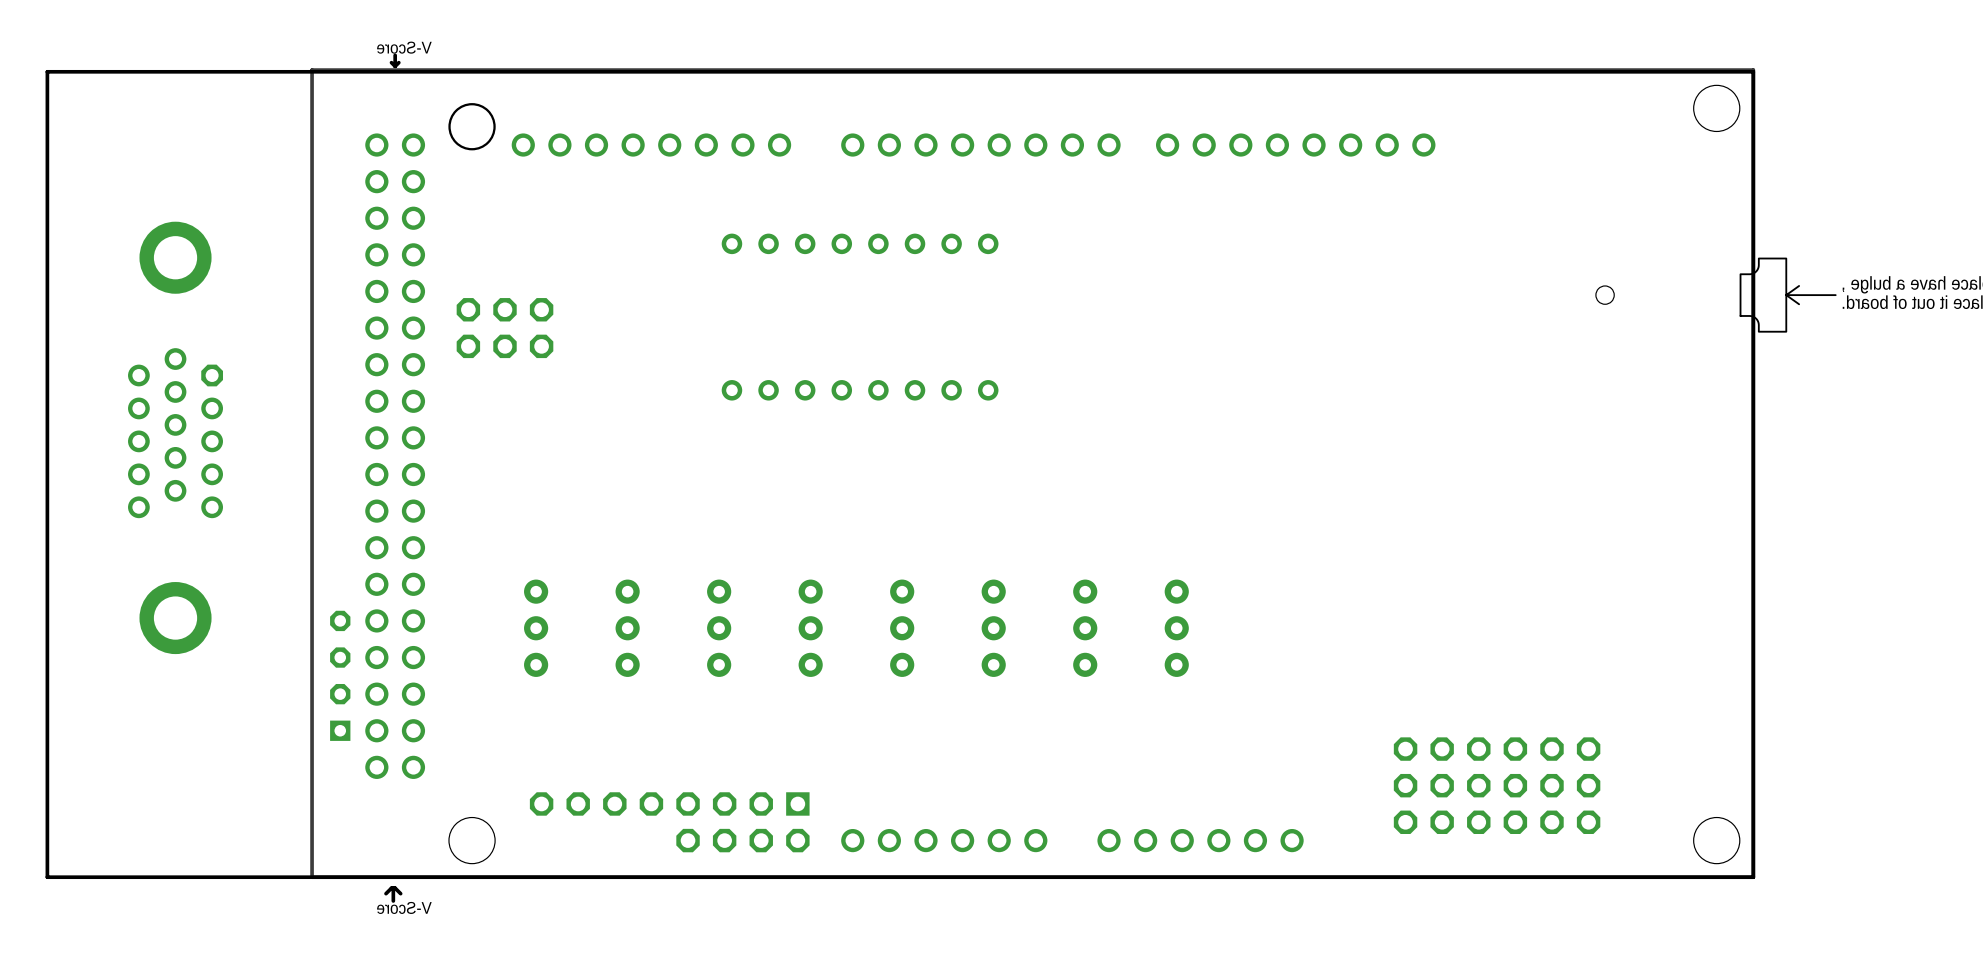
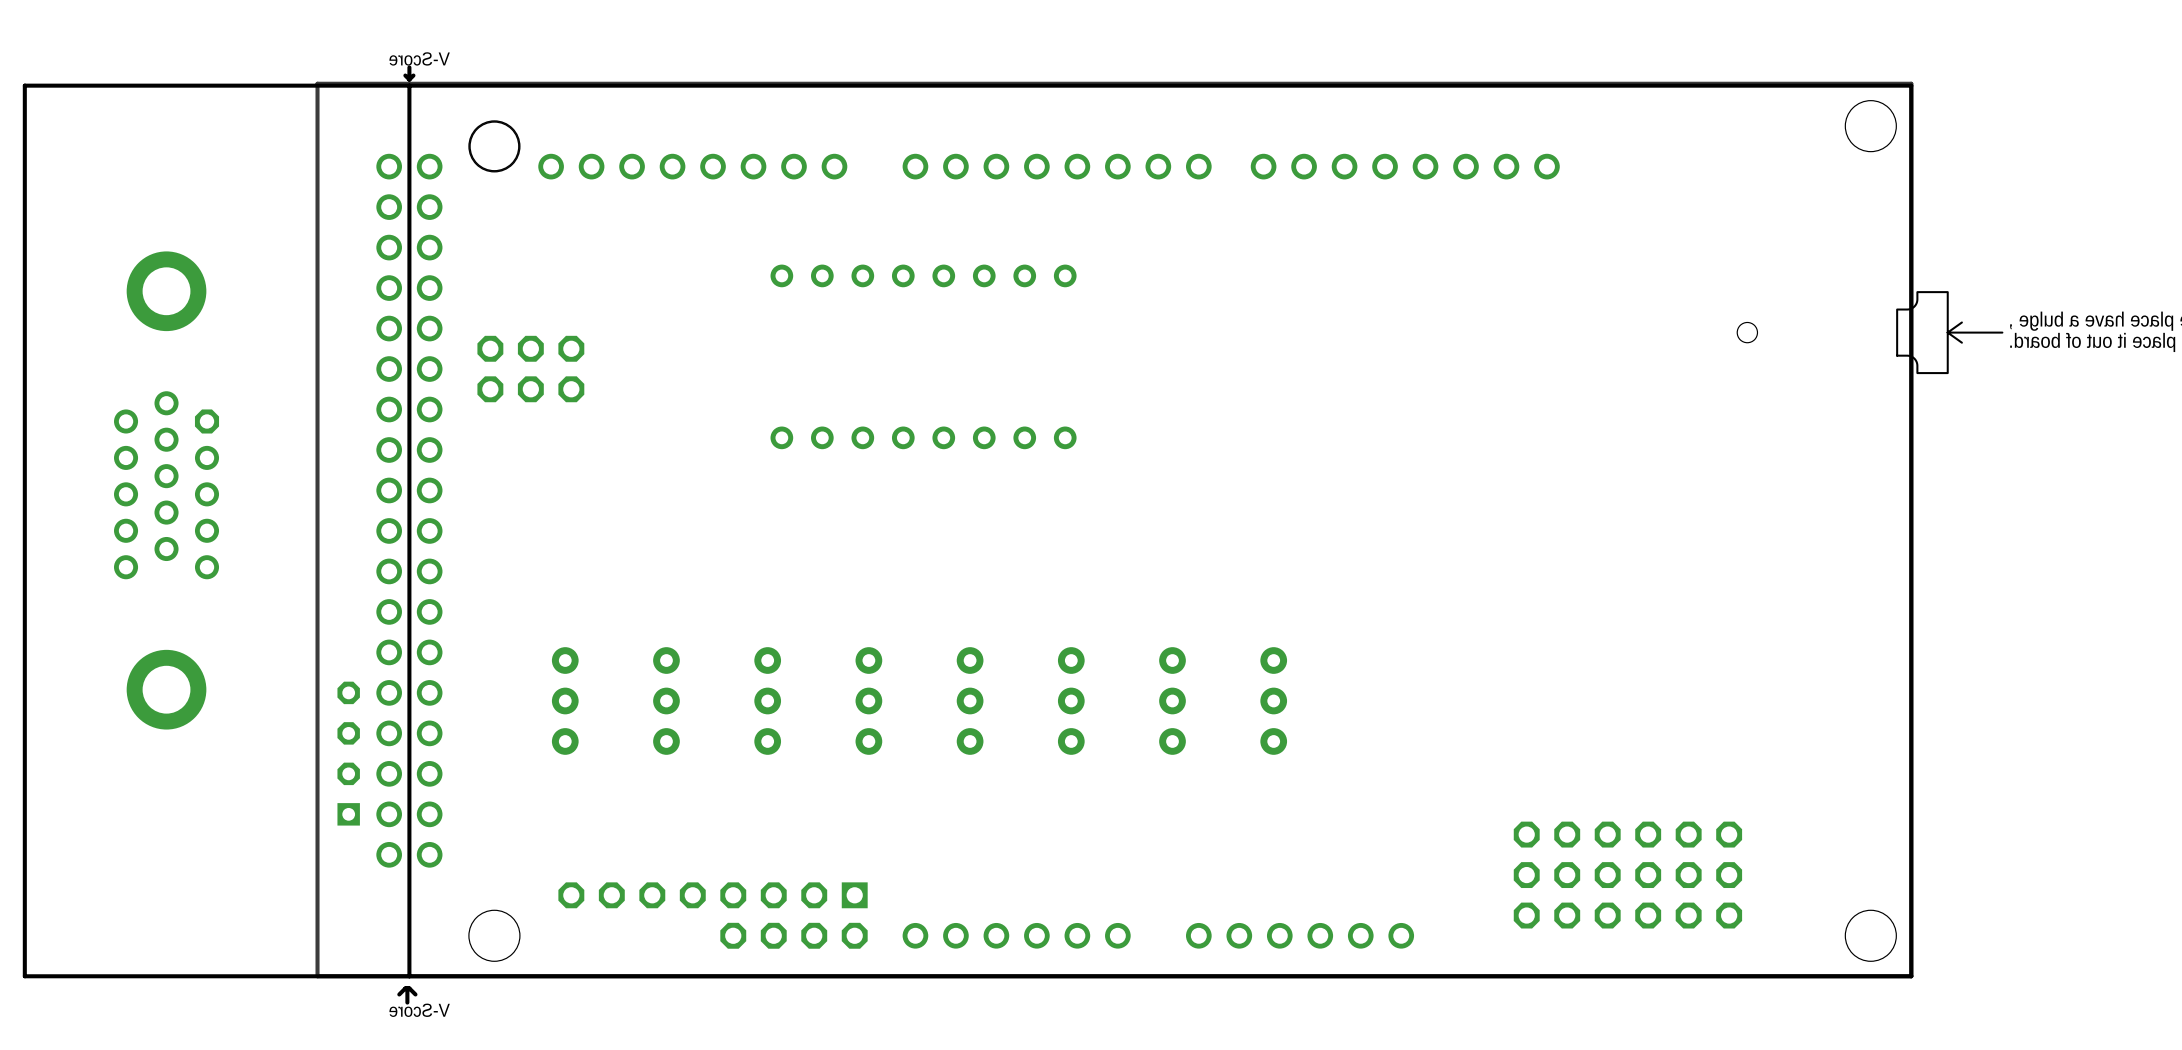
board edge: none -> (409, 85) (409, 976)

